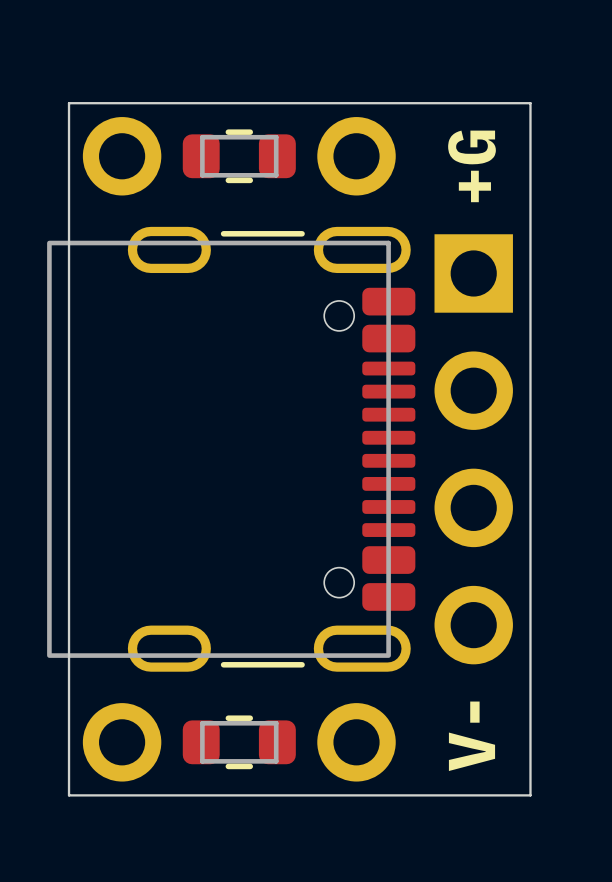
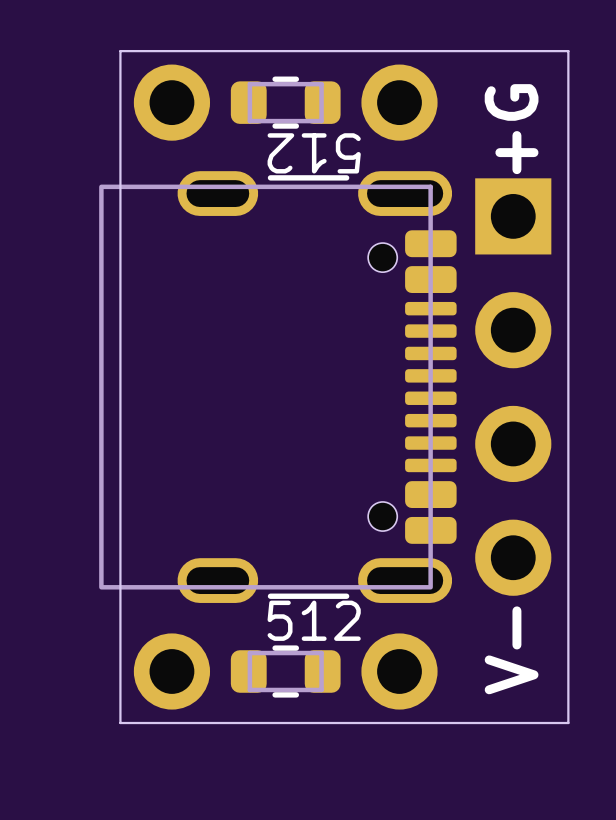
text: none -> 512 (314, 153)
text: none -> 512 (314, 620)

